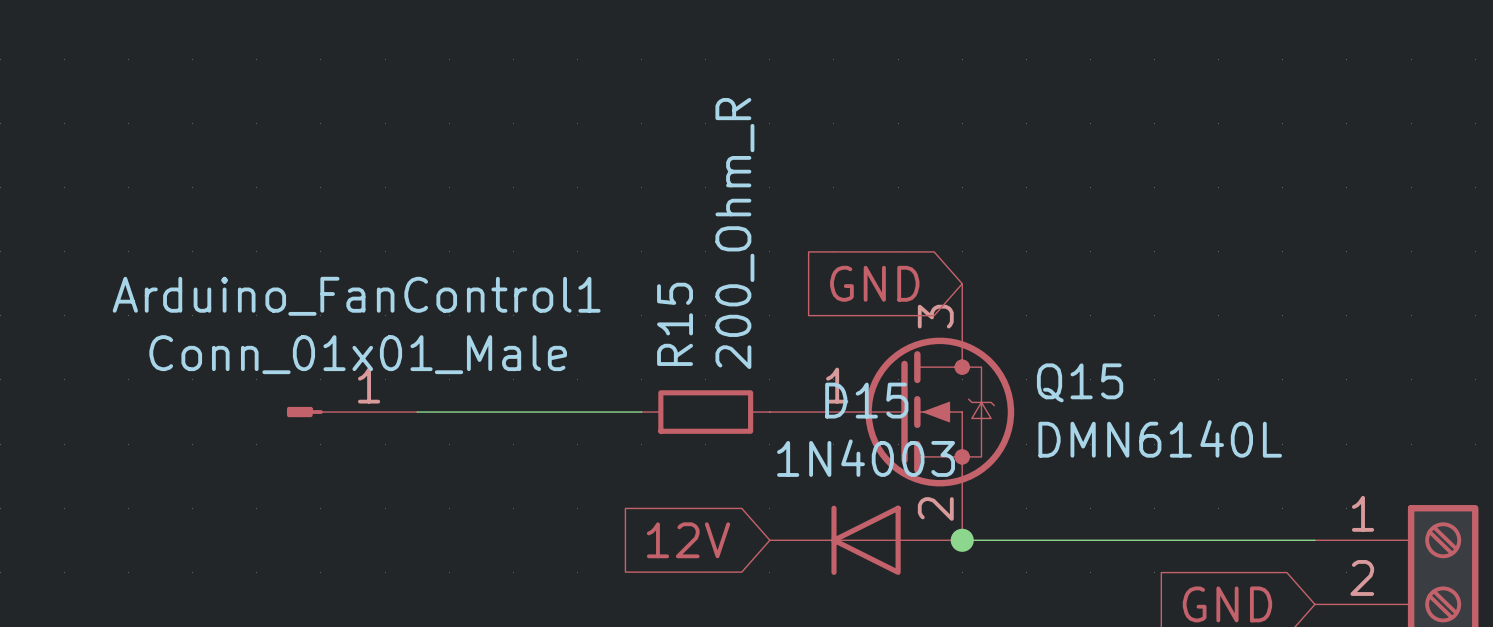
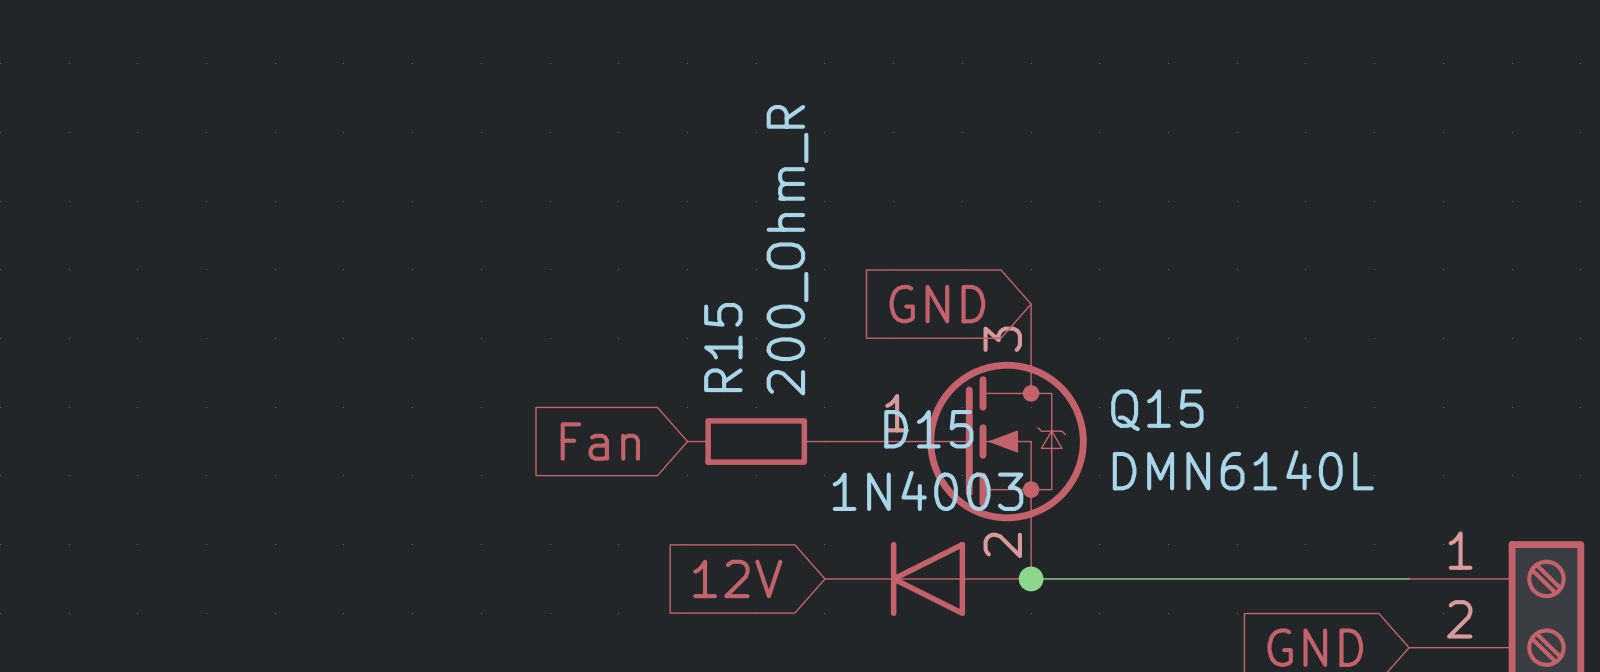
Arduino_FanControl1: Conn_01x01_Male (352, 412) -> none
wire: (417, 412) (641, 412) -> none
global label: none -> Fan (600, 441)

